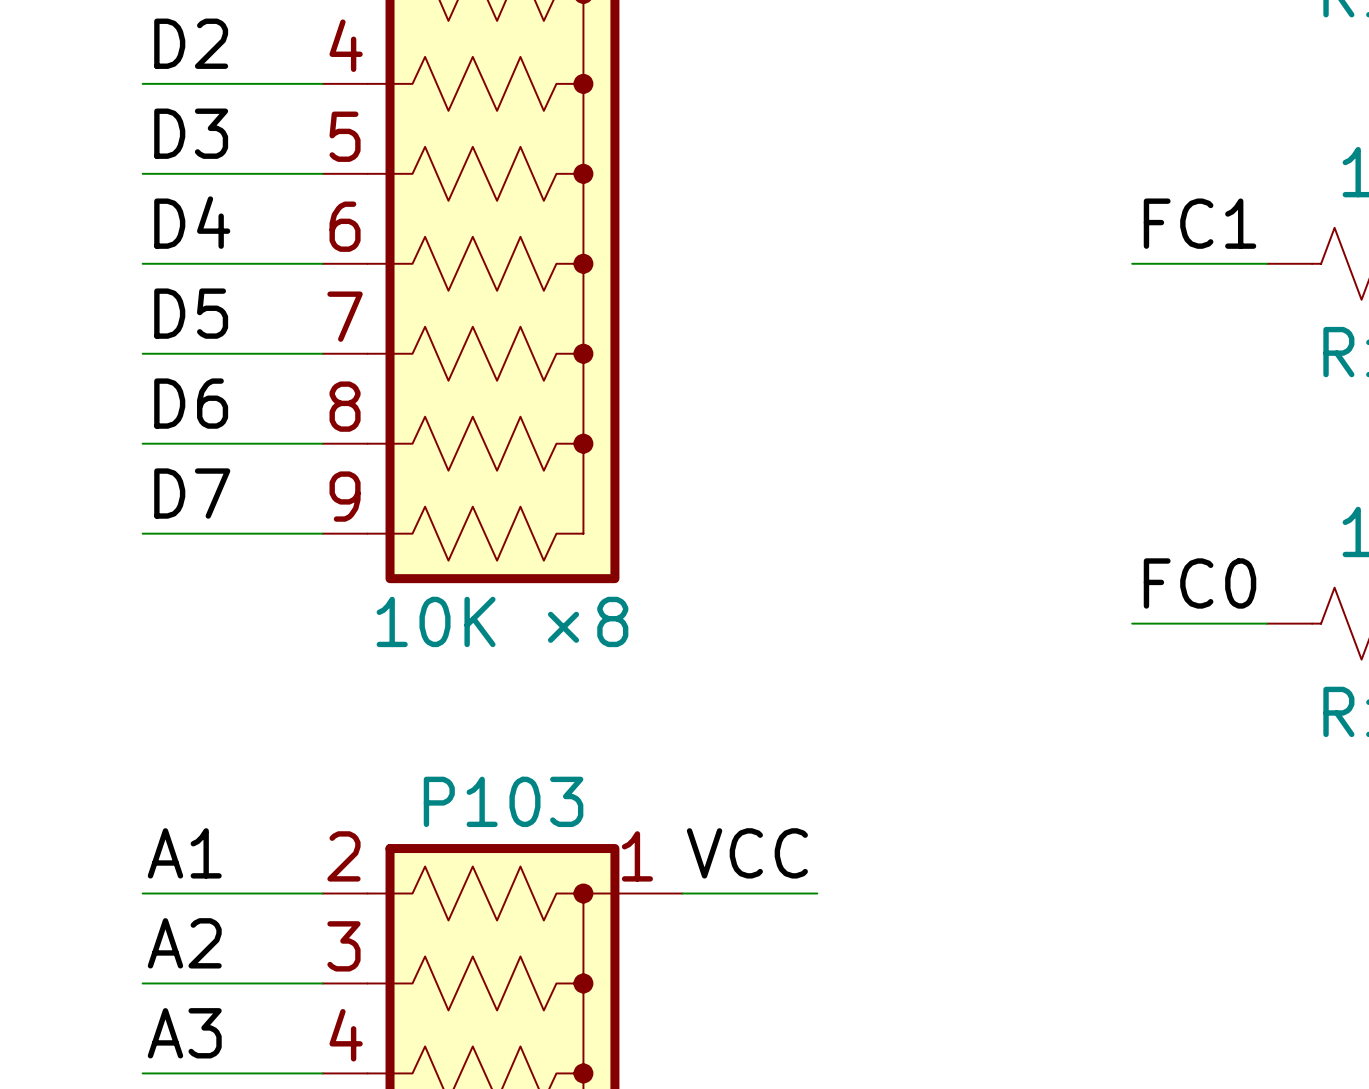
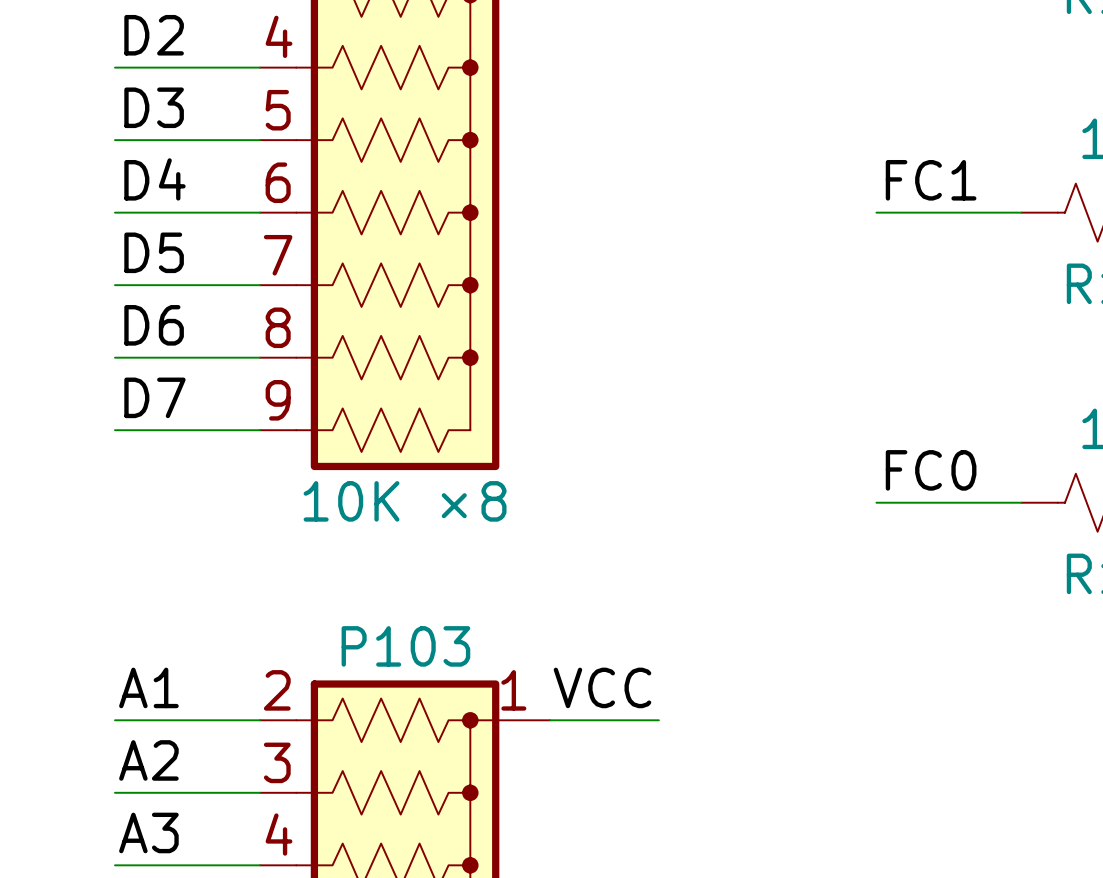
label position: FC1 (1200, 223) -> FC1 (931, 180)
wire: none -> (876, 212) (912, 212)
label position: FC0 (1200, 583) -> FC0 (931, 470)
wire: none -> (876, 502) (912, 502)

